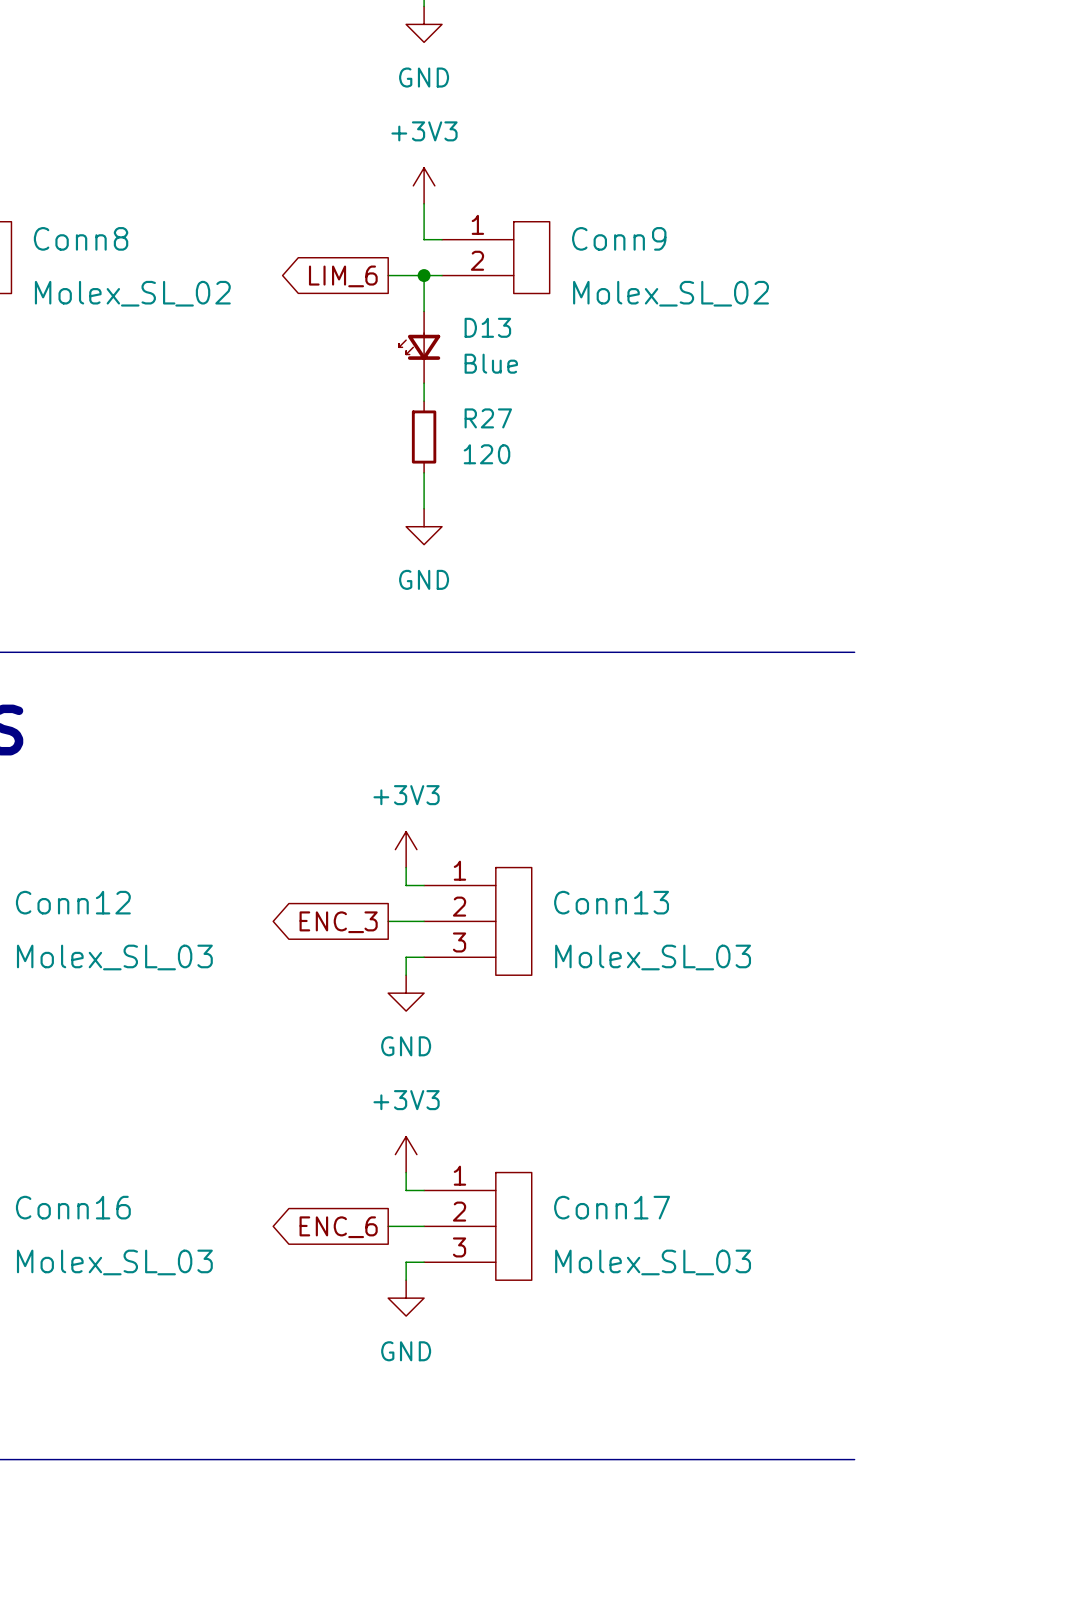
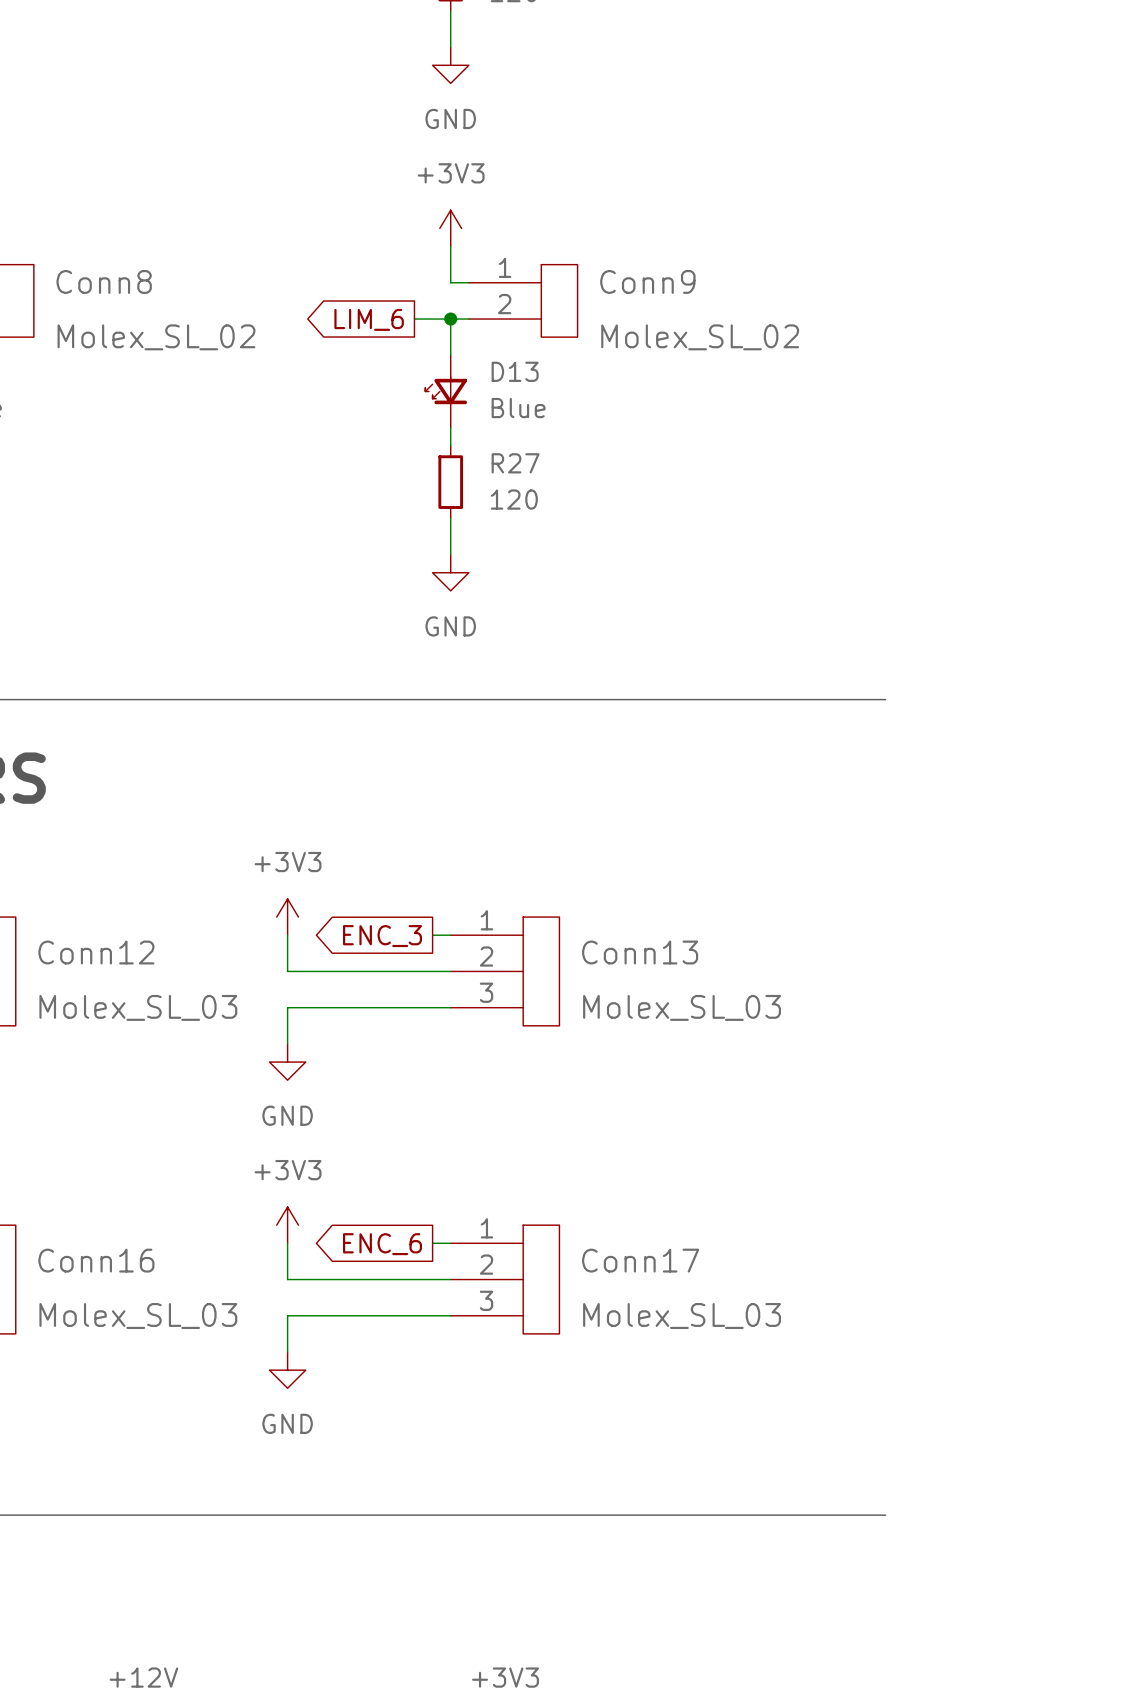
power symbol position: +3V3 (406, 849) -> +3V3 (287, 917)
wire: none -> (287, 935) (287, 971) (414, 971)
global label position: ENC_3 (338, 922) -> ENC_3 (382, 936)
wire: (406, 957) (406, 975) -> (432, 1007) (287, 1007) (287, 1043)
power symbol position: GND (406, 993) -> GND (287, 1062)
power symbol position: +3V3 (406, 1154) -> +3V3 (287, 1225)
wire: none -> (287, 1243) (287, 1279) (414, 1279)
global label position: ENC_6 (338, 1227) -> ENC_6 (382, 1244)
wire: (406, 1262) (406, 1280) -> (432, 1315) (287, 1315) (287, 1352)
power symbol position: GND (406, 1298) -> GND (287, 1370)

